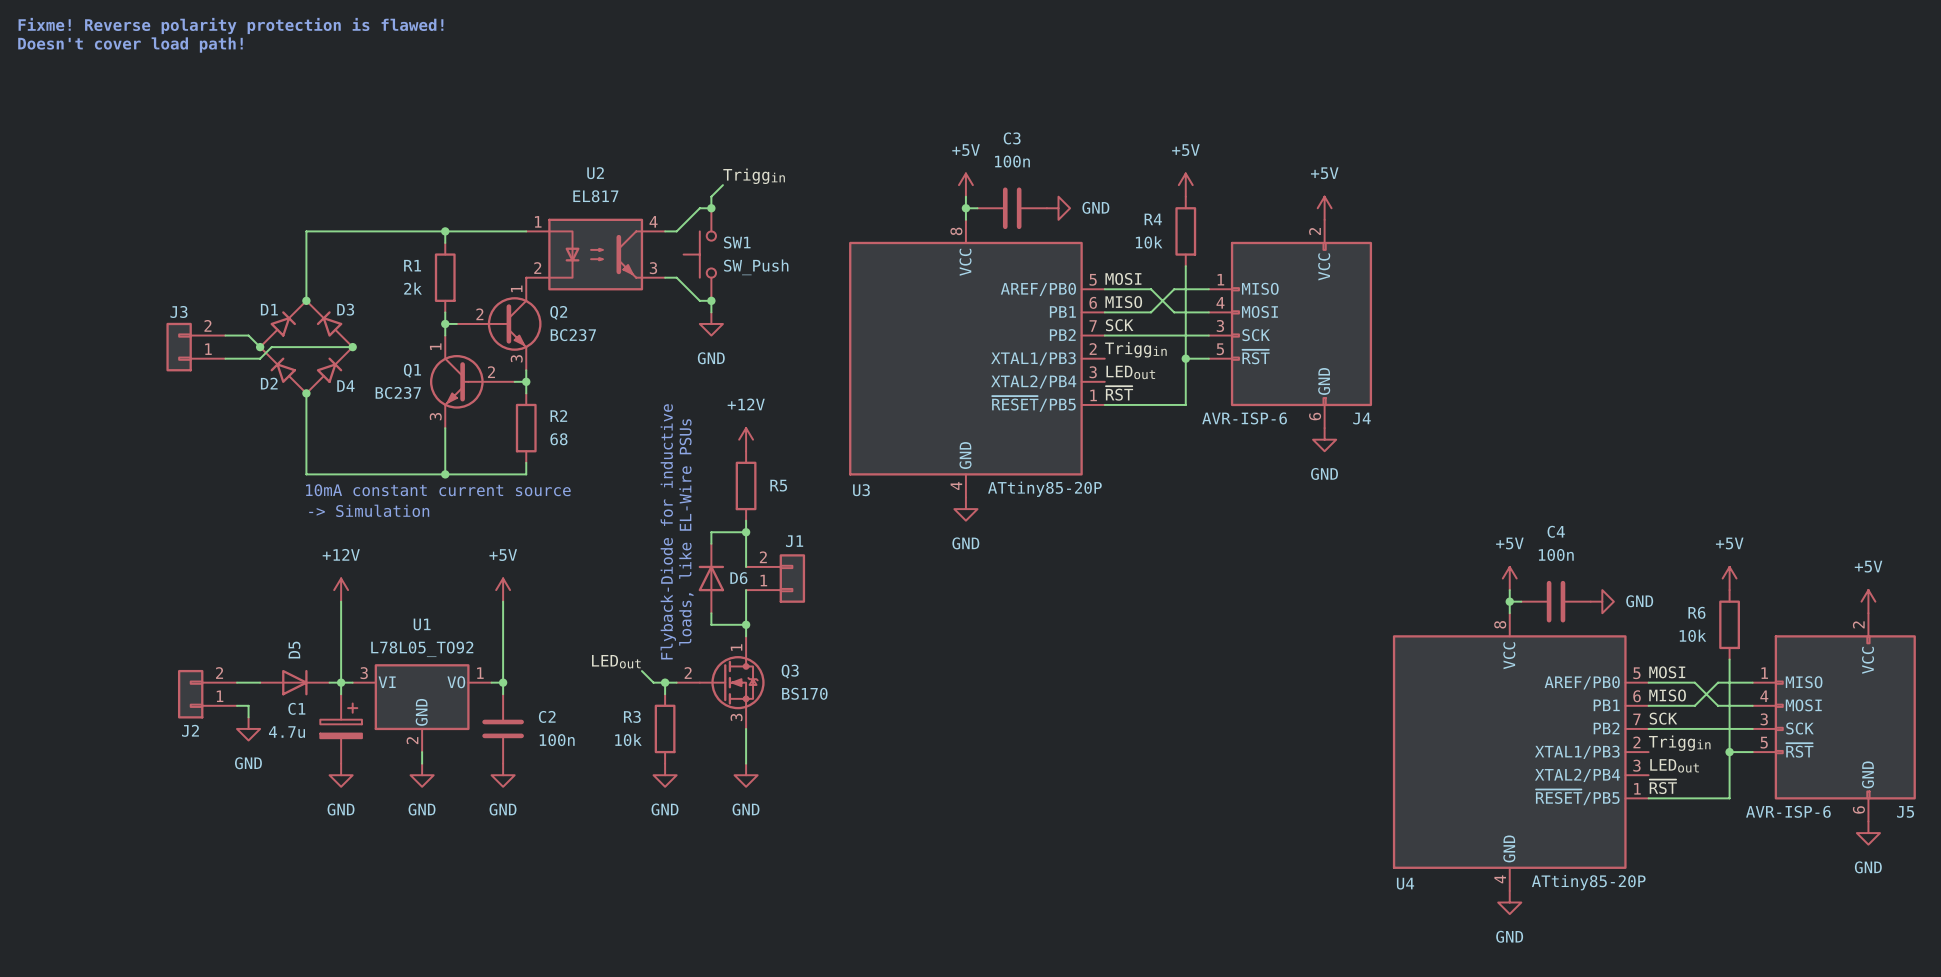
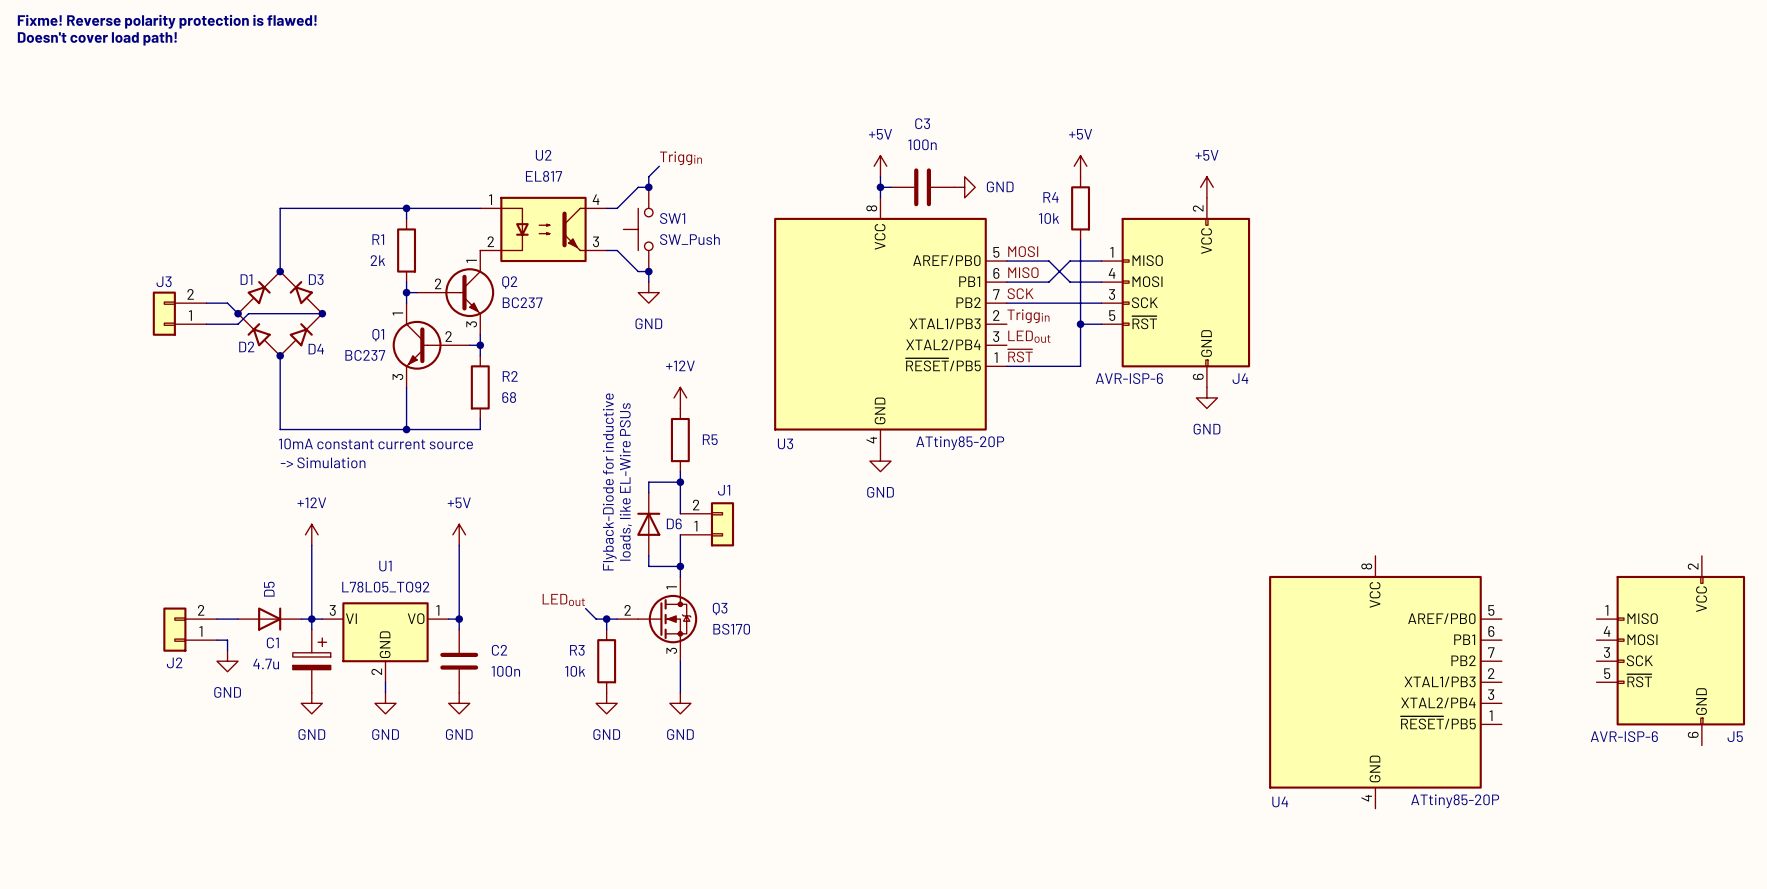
power symbol: +5V (1509, 578) -> none
power symbol: +5V (1729, 578) -> none
wire: (1509, 590) (1509, 613) -> none
wire: (1509, 601) (1521, 601) -> none
junction: (1509, 601) -> none
C4: 100n (1556, 601) -> none
power symbol: GND (1602, 601) -> none
power symbol: +5V (1868, 601) -> none
R6: 10k (1729, 624) -> none
wire: (1729, 659) (1729, 798) (1648, 798) -> none
label: MOSI (1667, 672) -> none
wire: (1648, 682) (1694, 682) (1718, 705) (1752, 705) -> none
wire: (1752, 682) (1718, 682) (1694, 705) (1648, 705) -> none
label: MISO (1667, 695) -> none
label: SCK (1663, 718) -> none
wire: (1648, 728) (1752, 728) -> none
label: Triggin (1679, 743) -> none
wire: (1729, 752) (1752, 752) -> none
junction: (1729, 752) -> none
label: LEDout (1674, 765) -> none
label: ~{RST} (1663, 786) -> none
power symbol: GND (1868, 833) -> none
power symbol: GND (1509, 902) -> none

